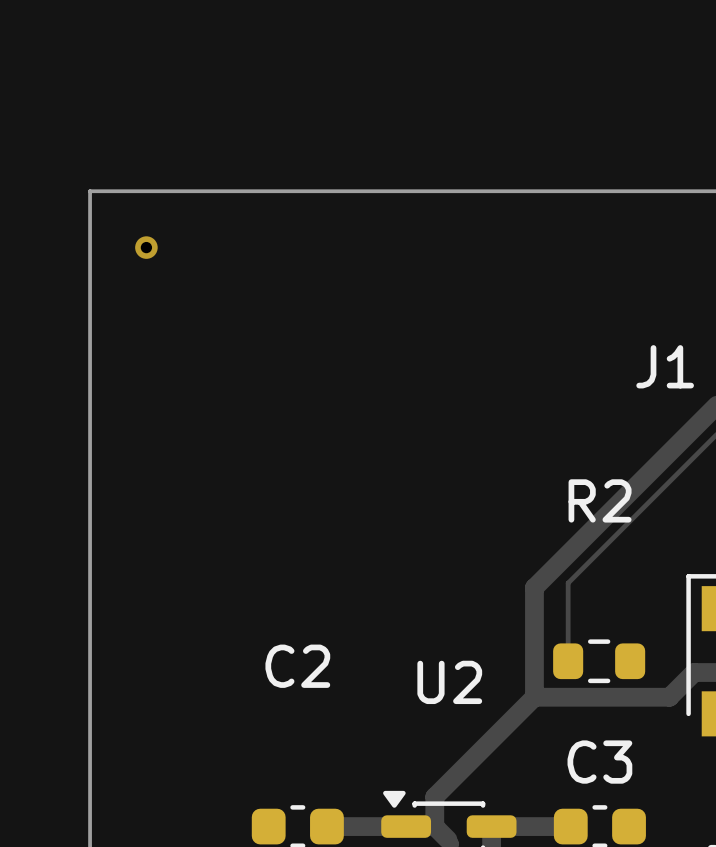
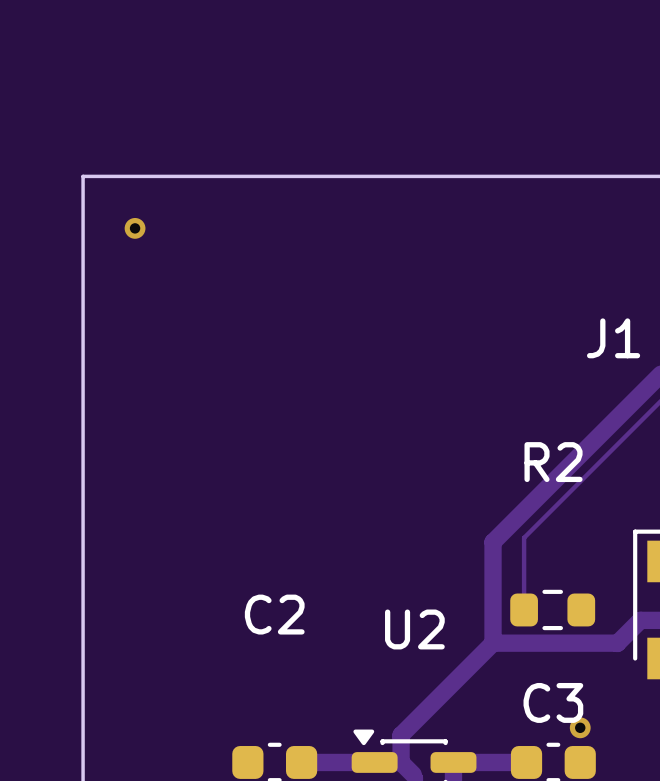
via: none -> (580, 727)

